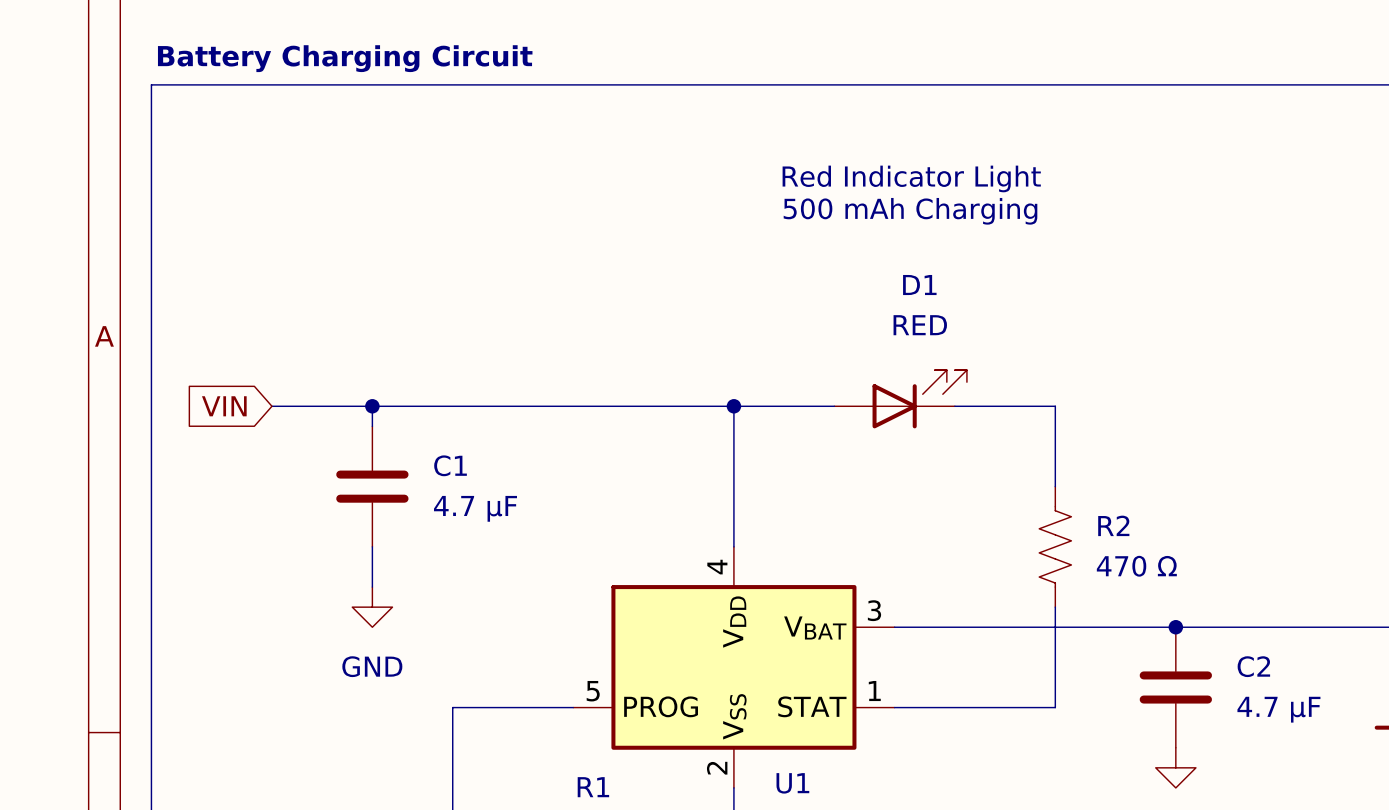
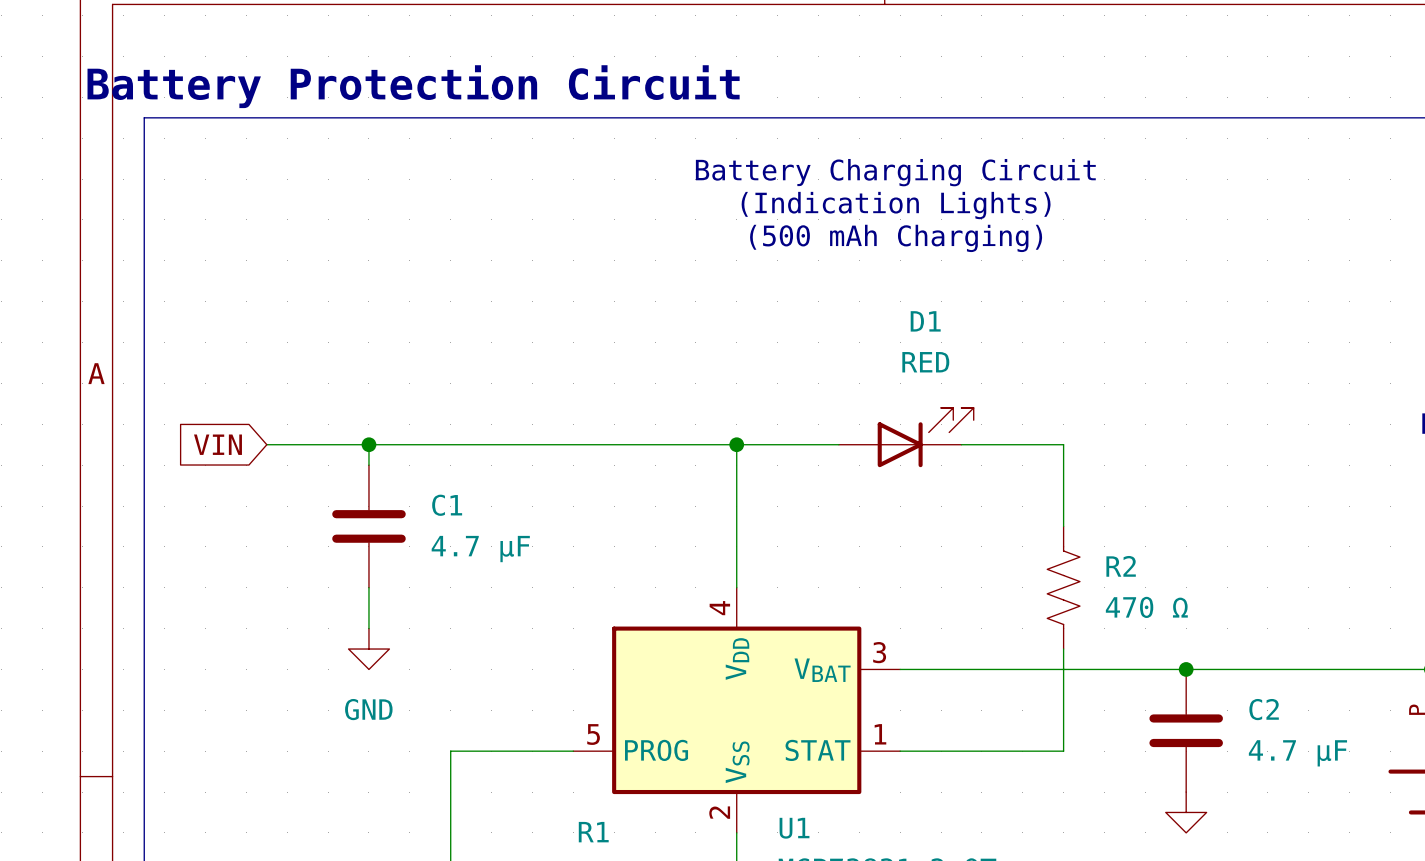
text: Battery Charging Circuit (345, 58) -> Battery Protection Circuit (413, 86)
text: none -> Battery Charging Circuit (895, 172)
text: Red Indicator Light (911, 178) -> (Indication Lights) (896, 205)
text: 500 mAh Charging (910, 211) -> (500 mAh Charging) (896, 238)

